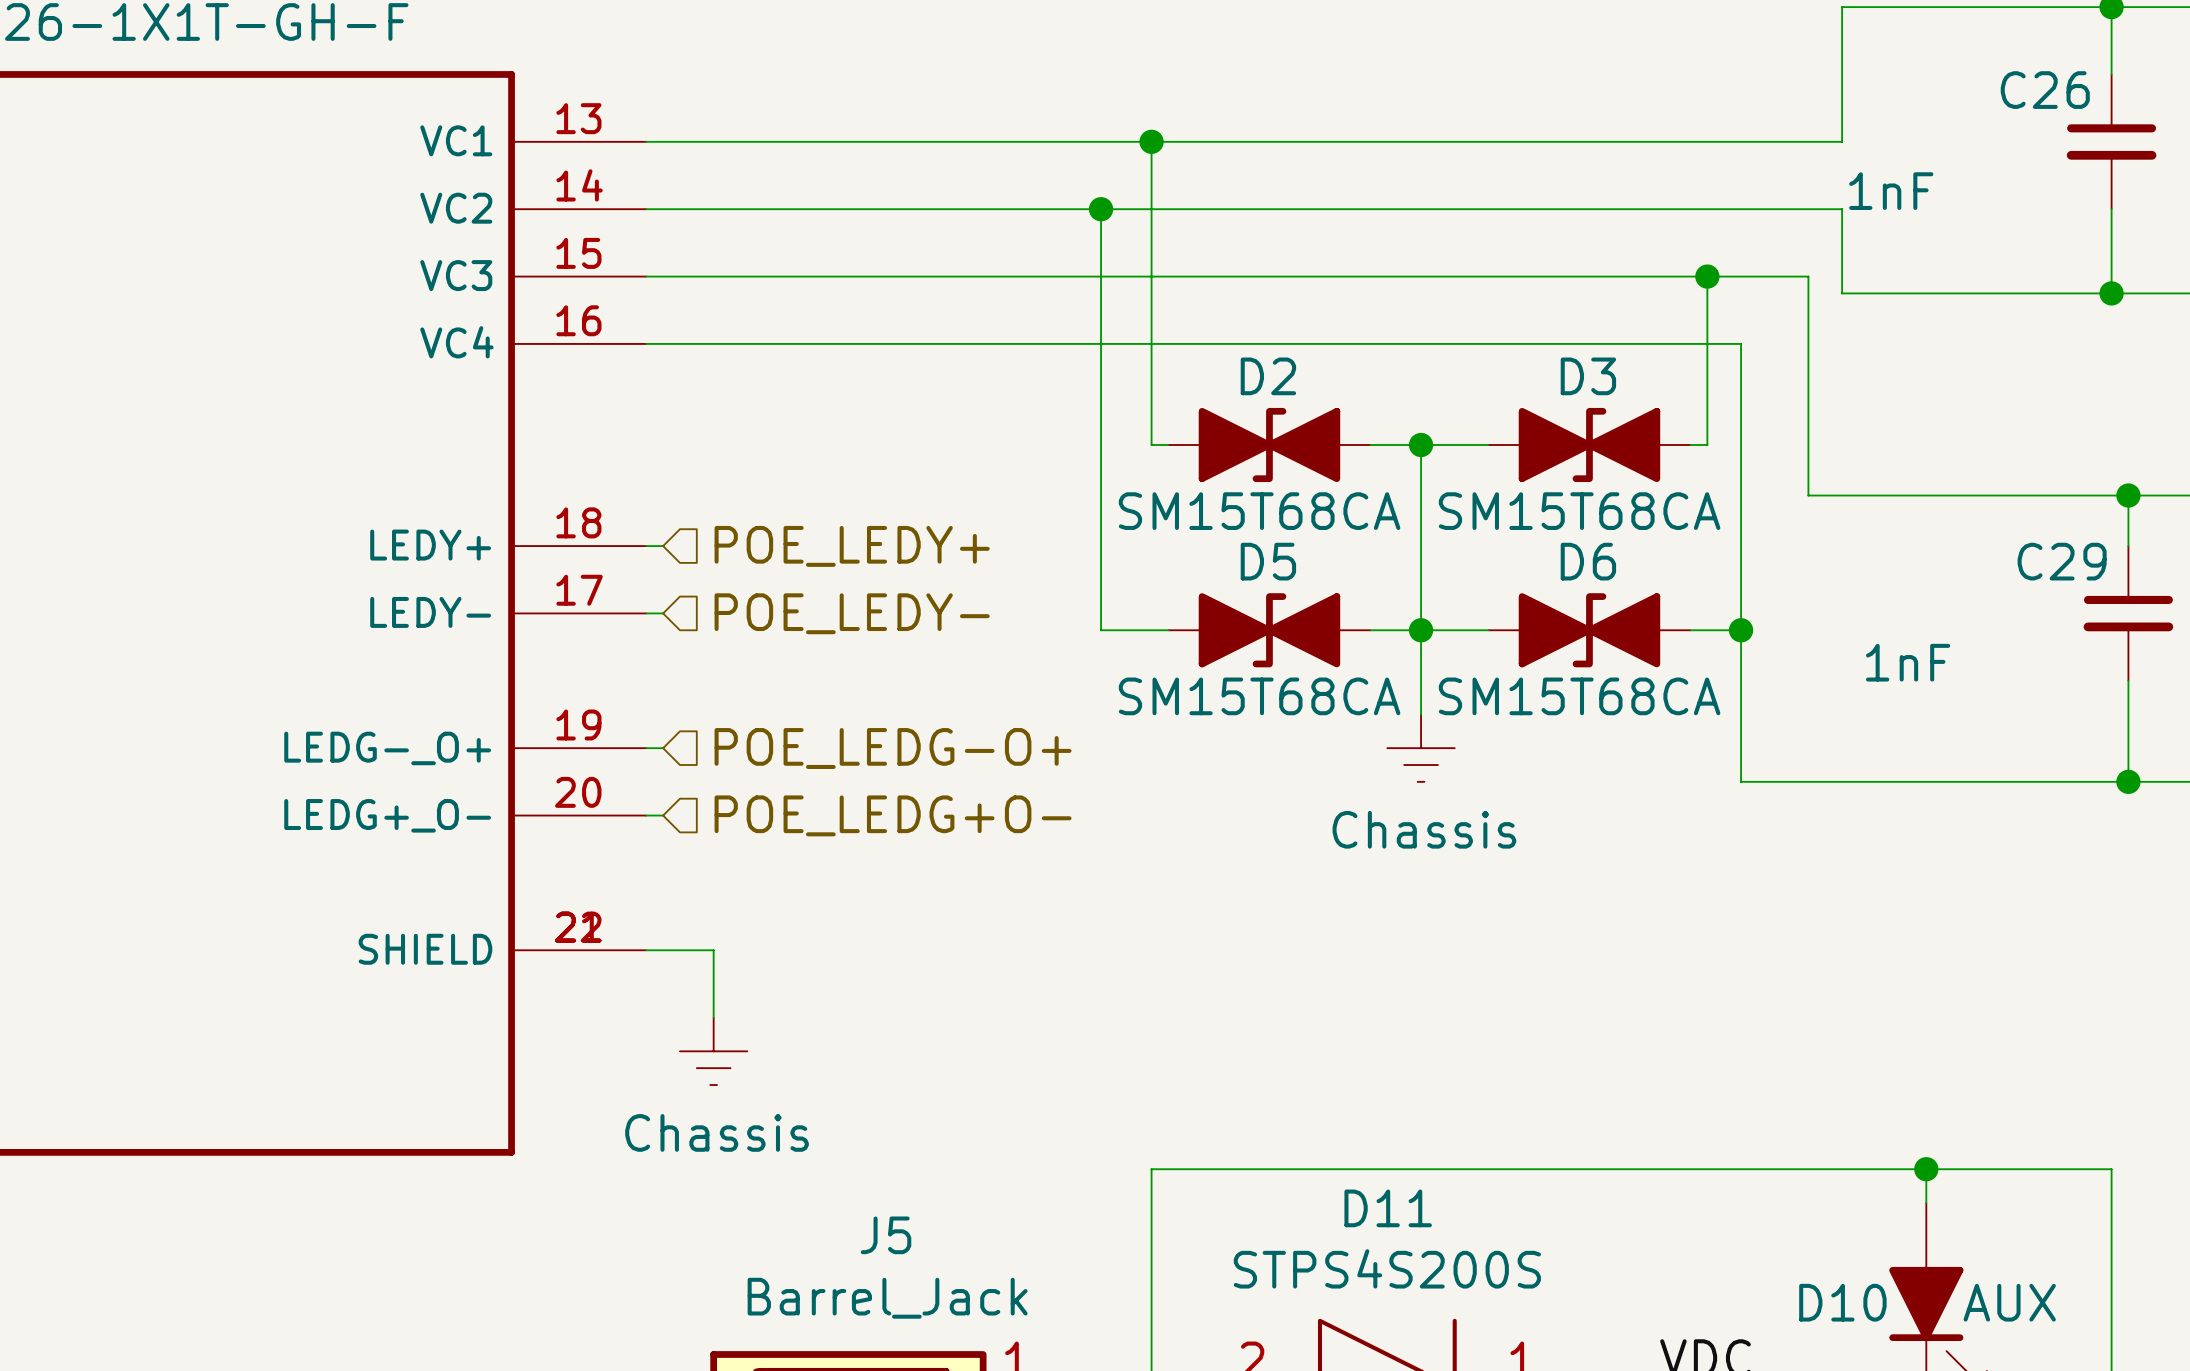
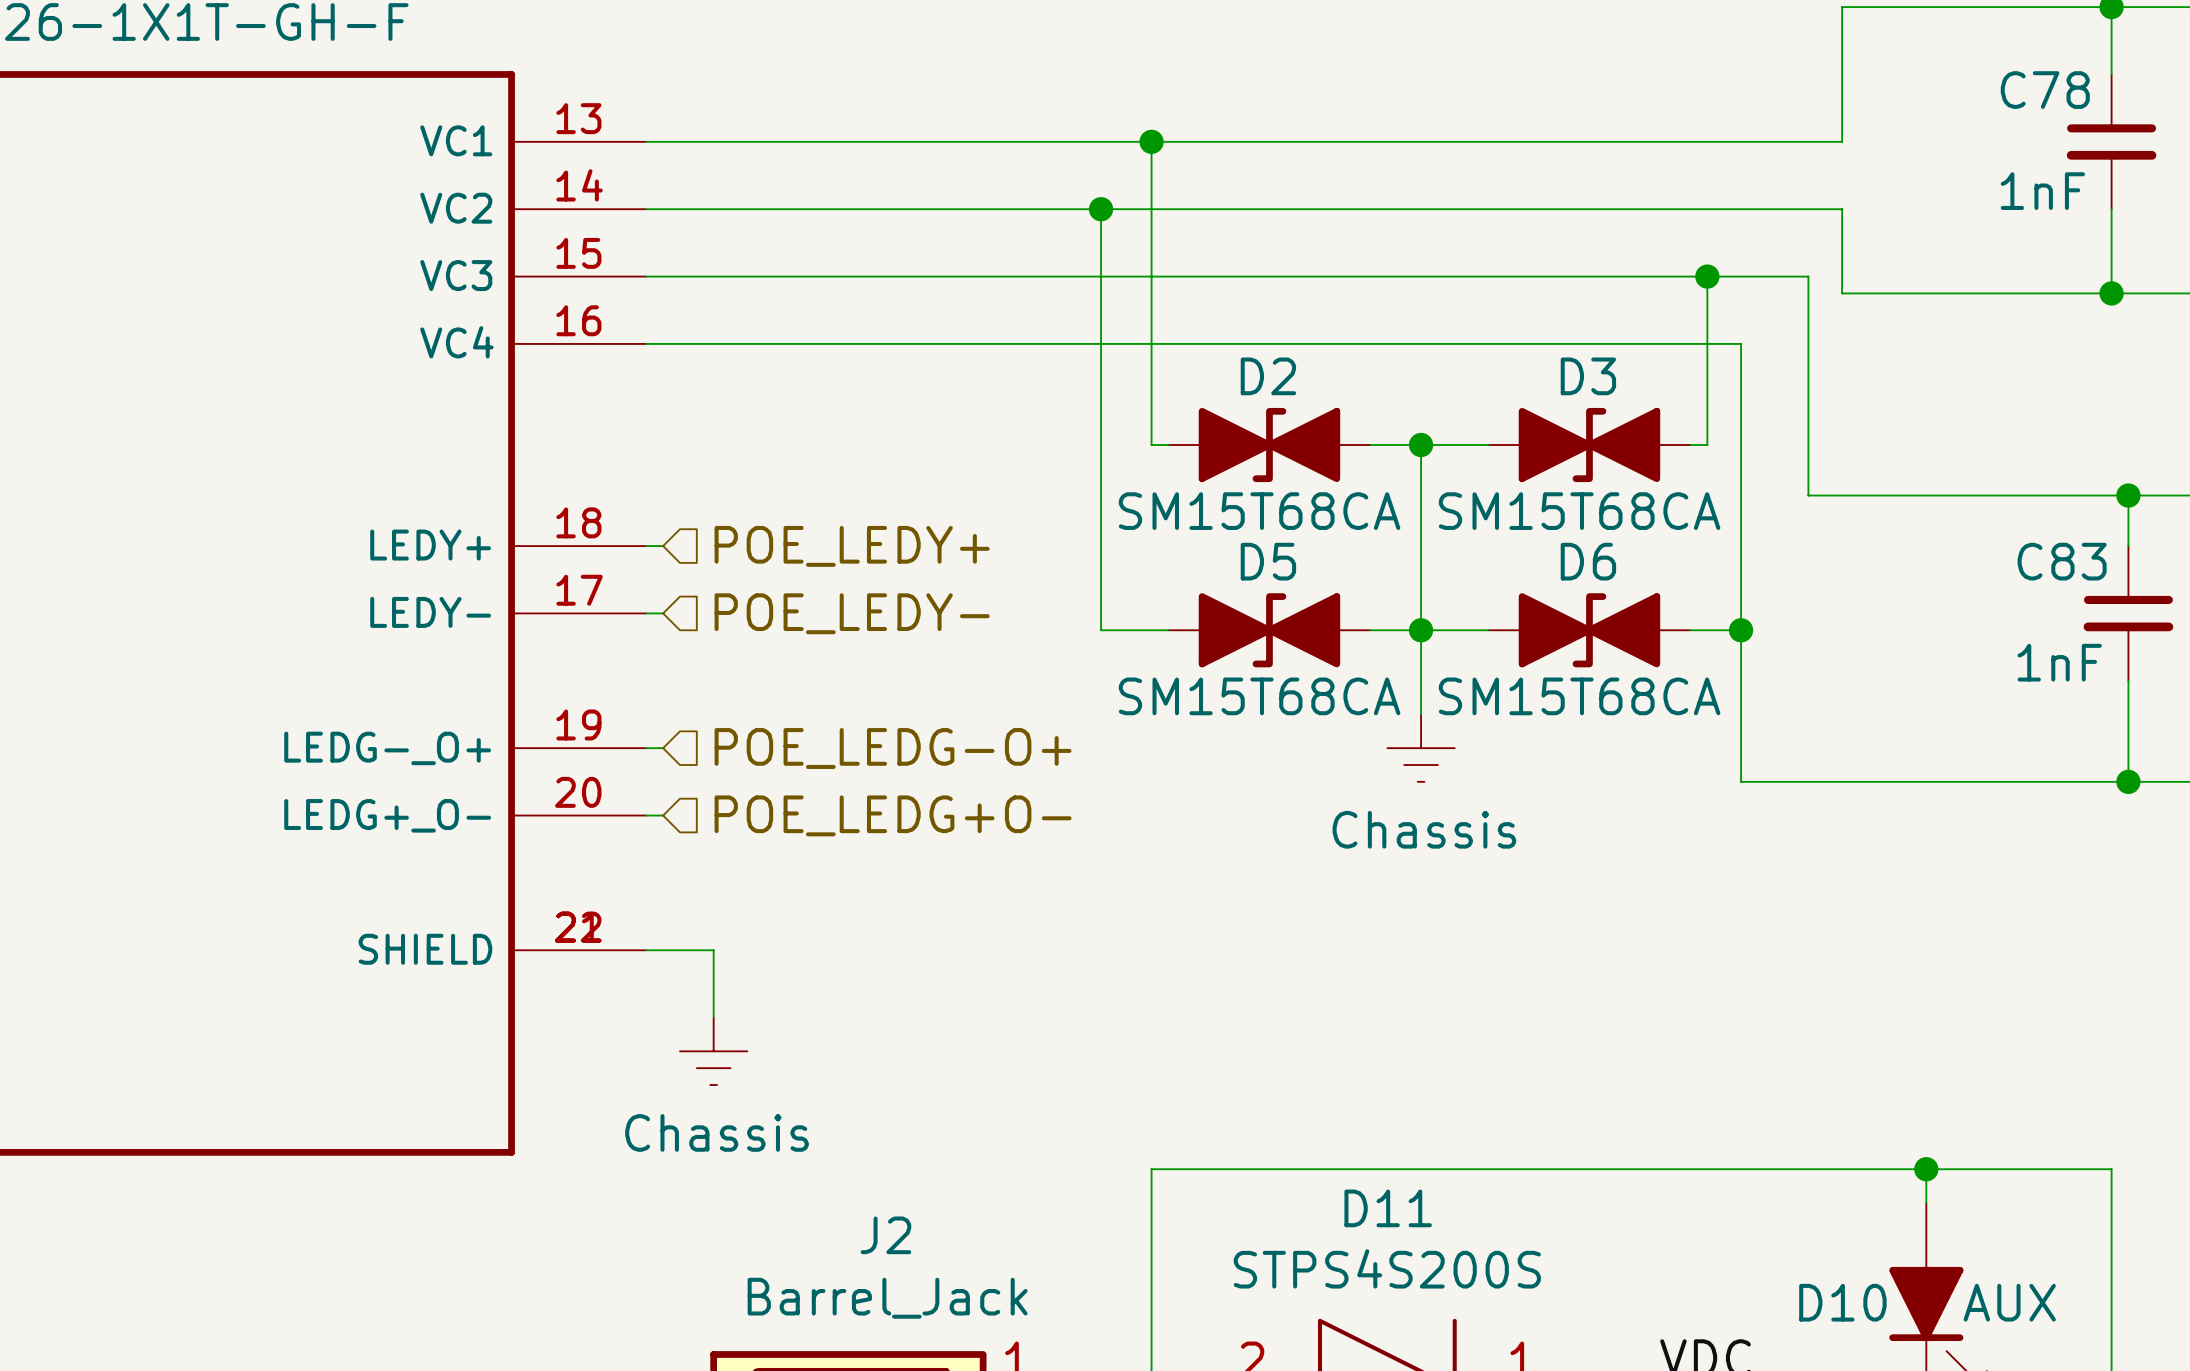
C26 name: C26 (2045, 90) -> C78 (2045, 90)
C26 value position: 1nF (1891, 191) -> 1nF (2042, 191)
C29 name: C29 (2062, 561) -> C83 (2062, 561)
C29 value position: 1nF (1908, 662) -> 1nF (2059, 662)
J5 name: J5 (885, 1235) -> J2 (885, 1235)

